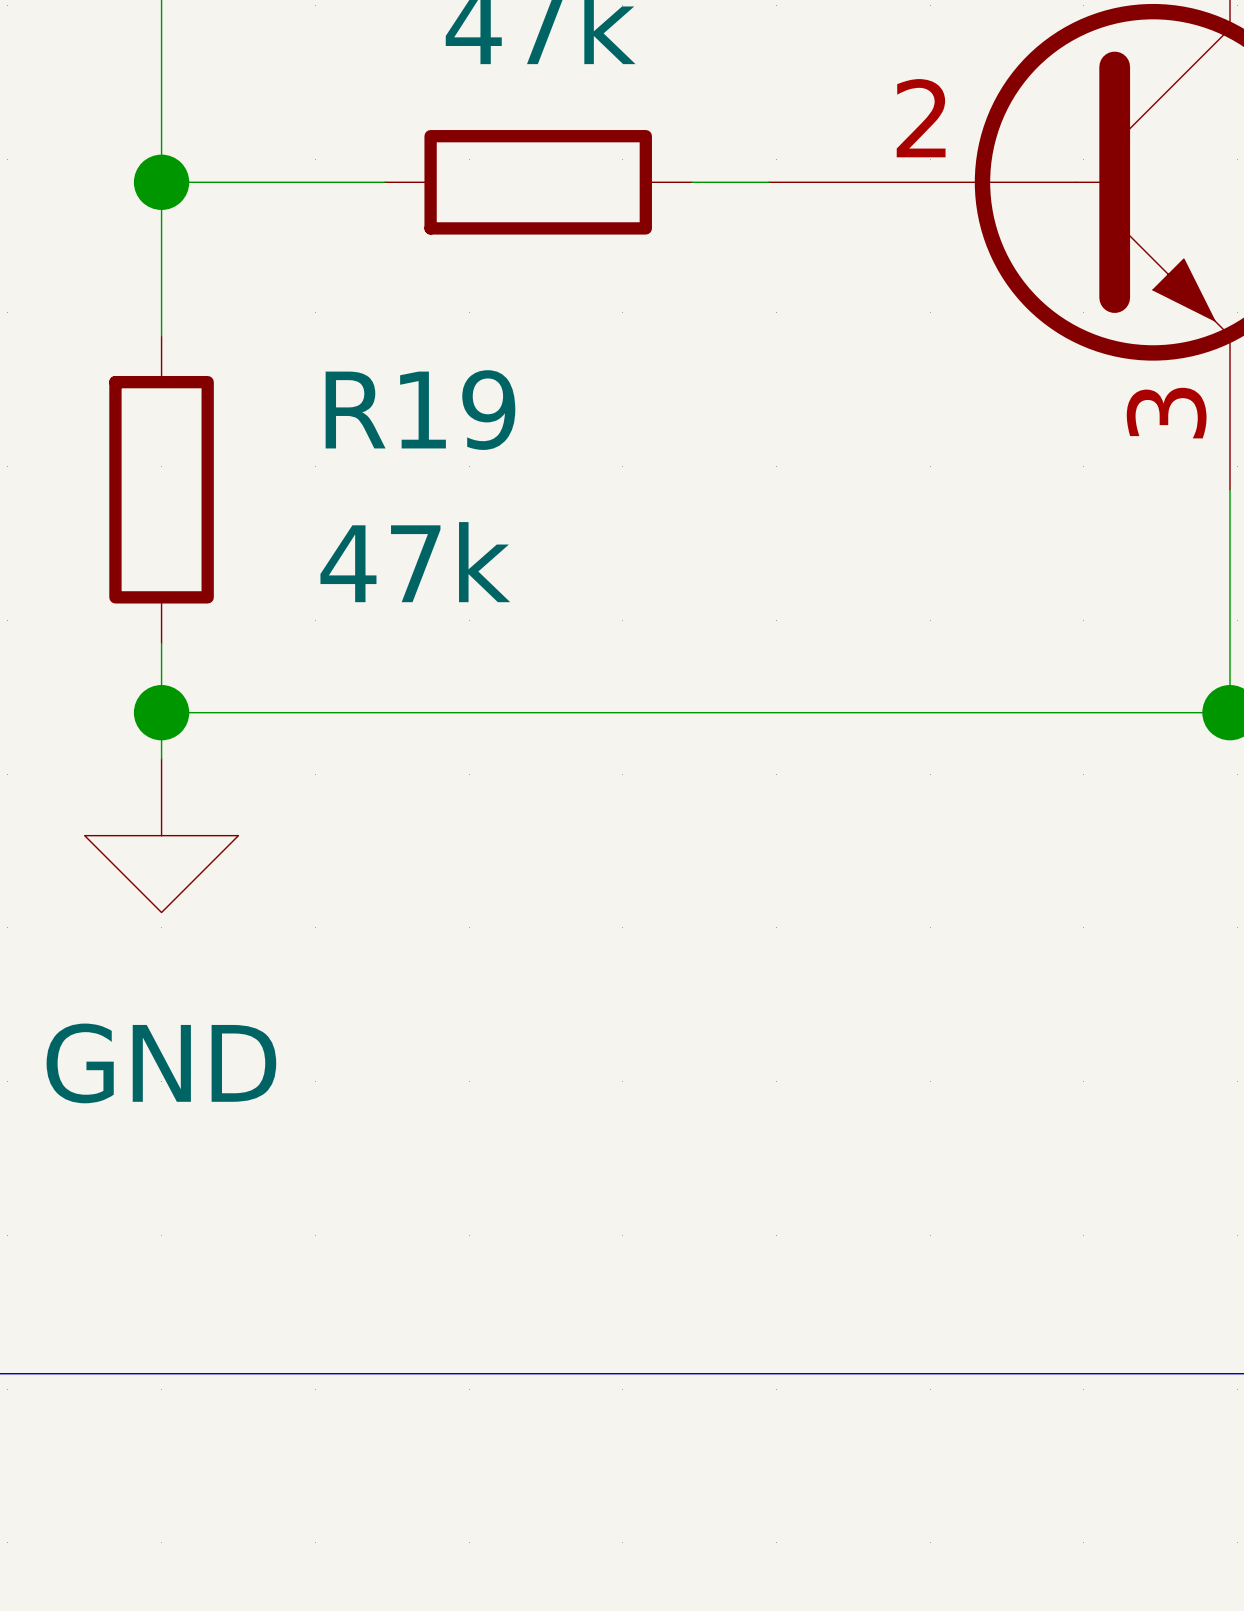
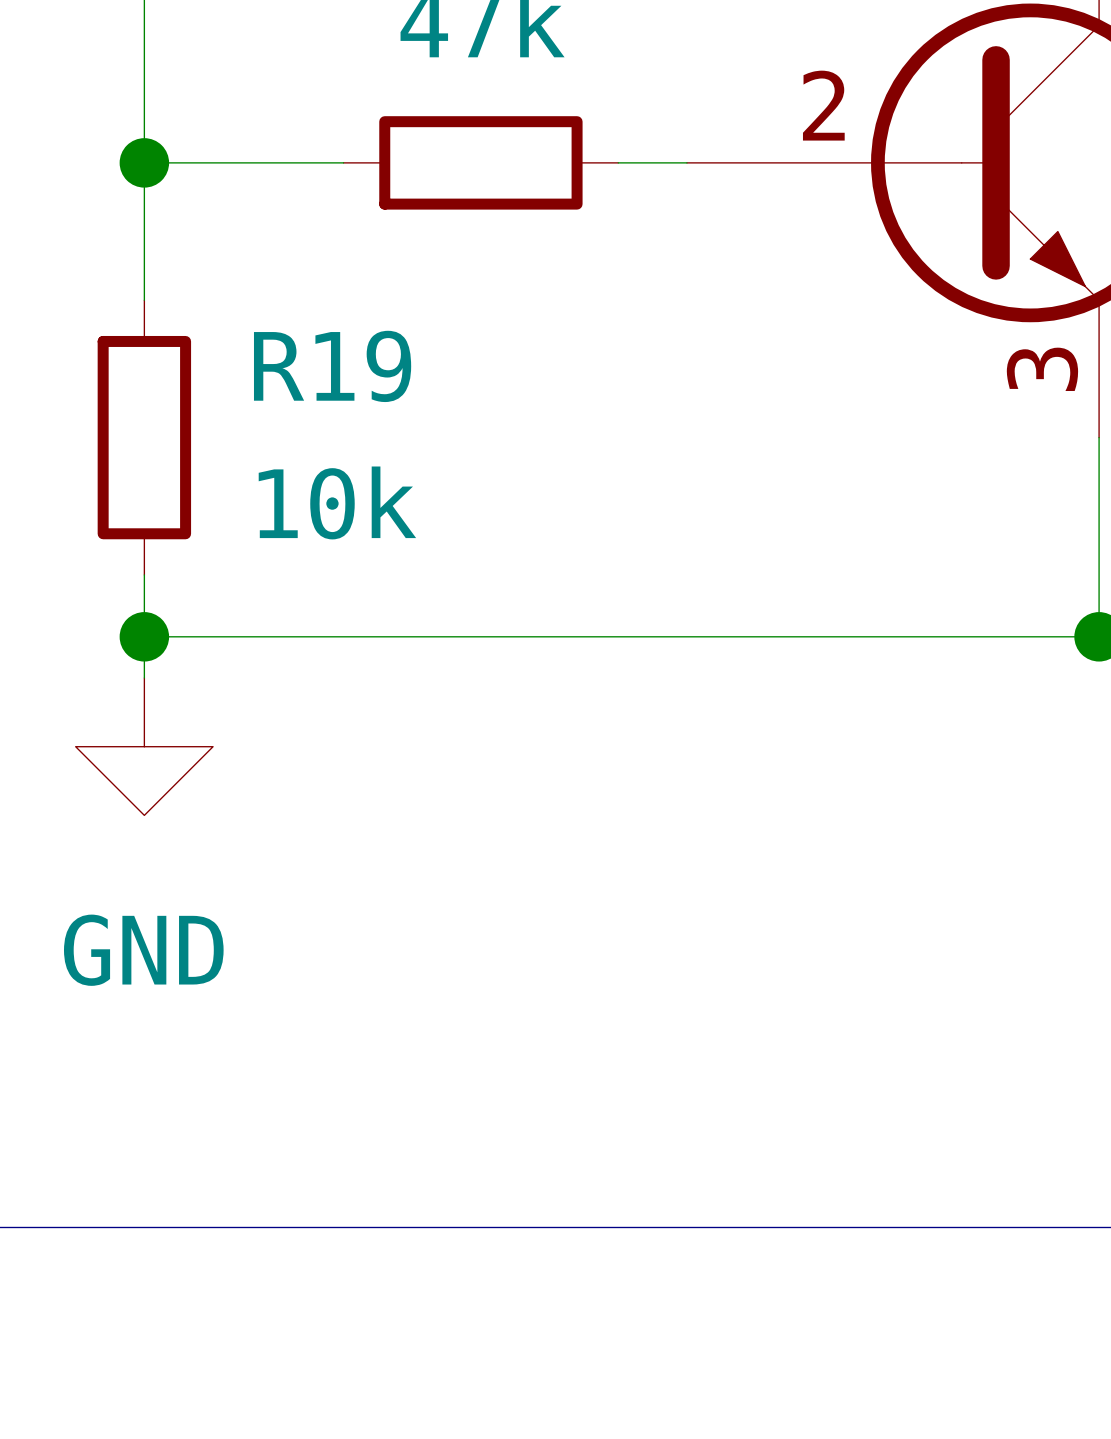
R19 name position: R19 (420, 410) -> R19 (332, 366)
R19 value: 47k (415, 562) -> 10k (337, 502)

